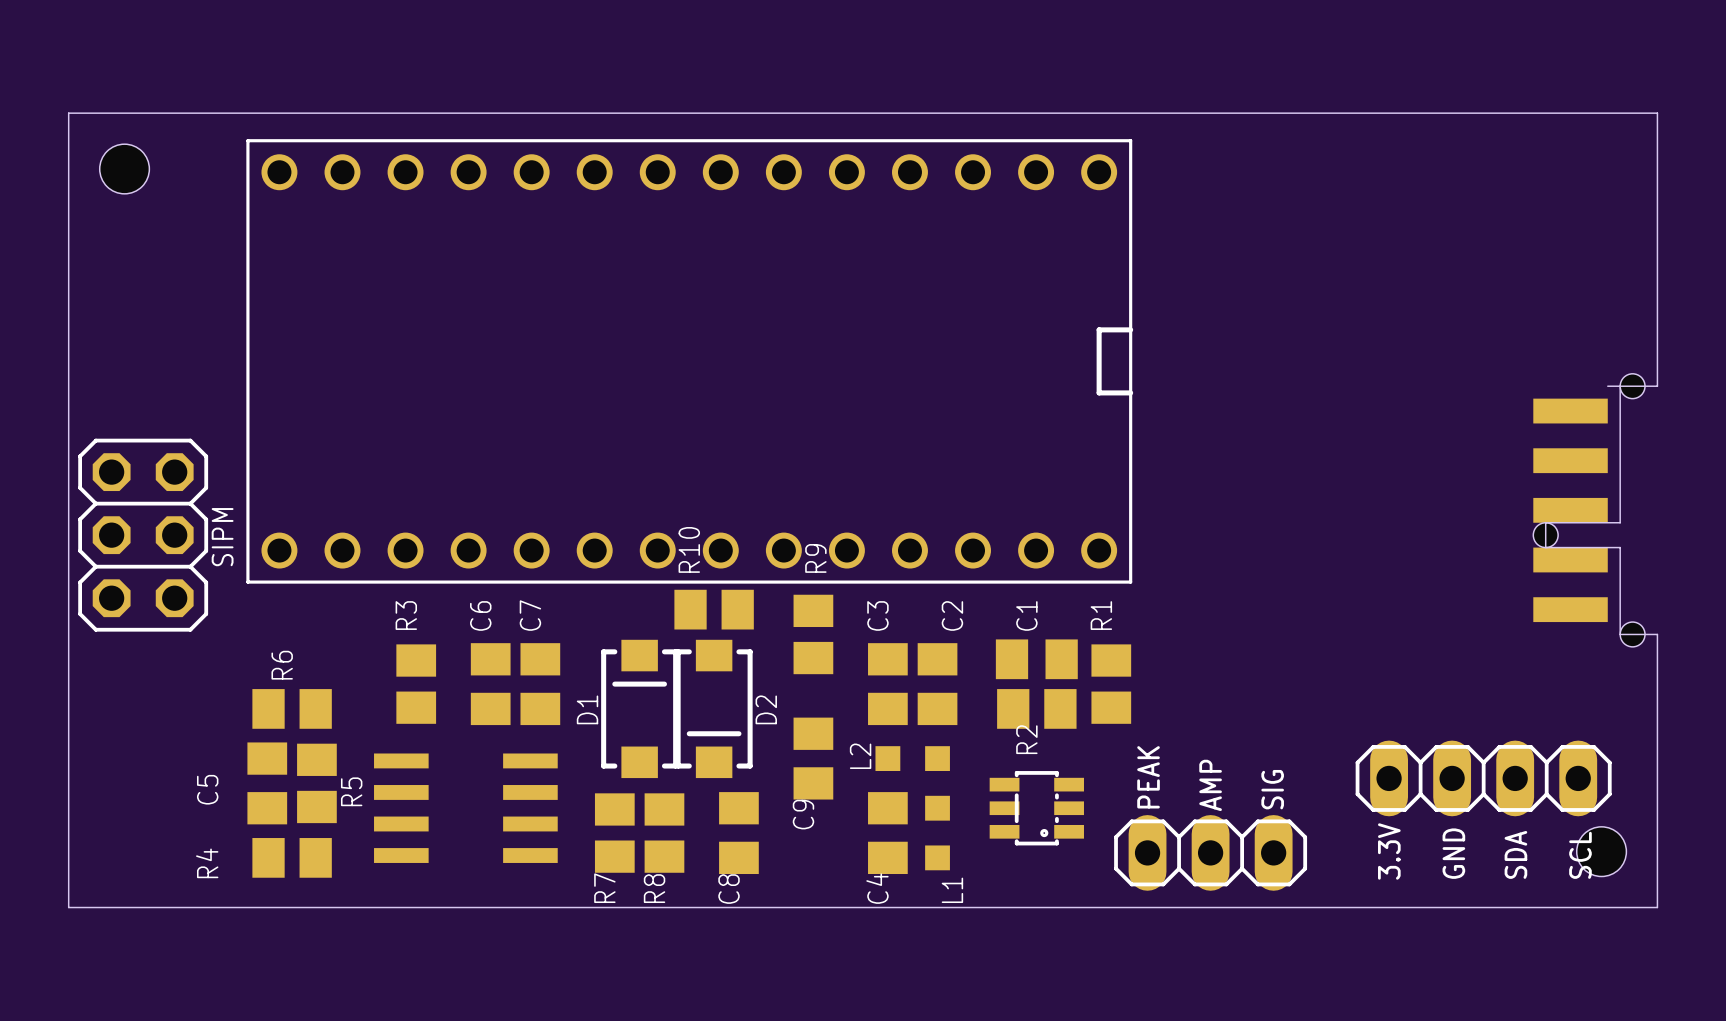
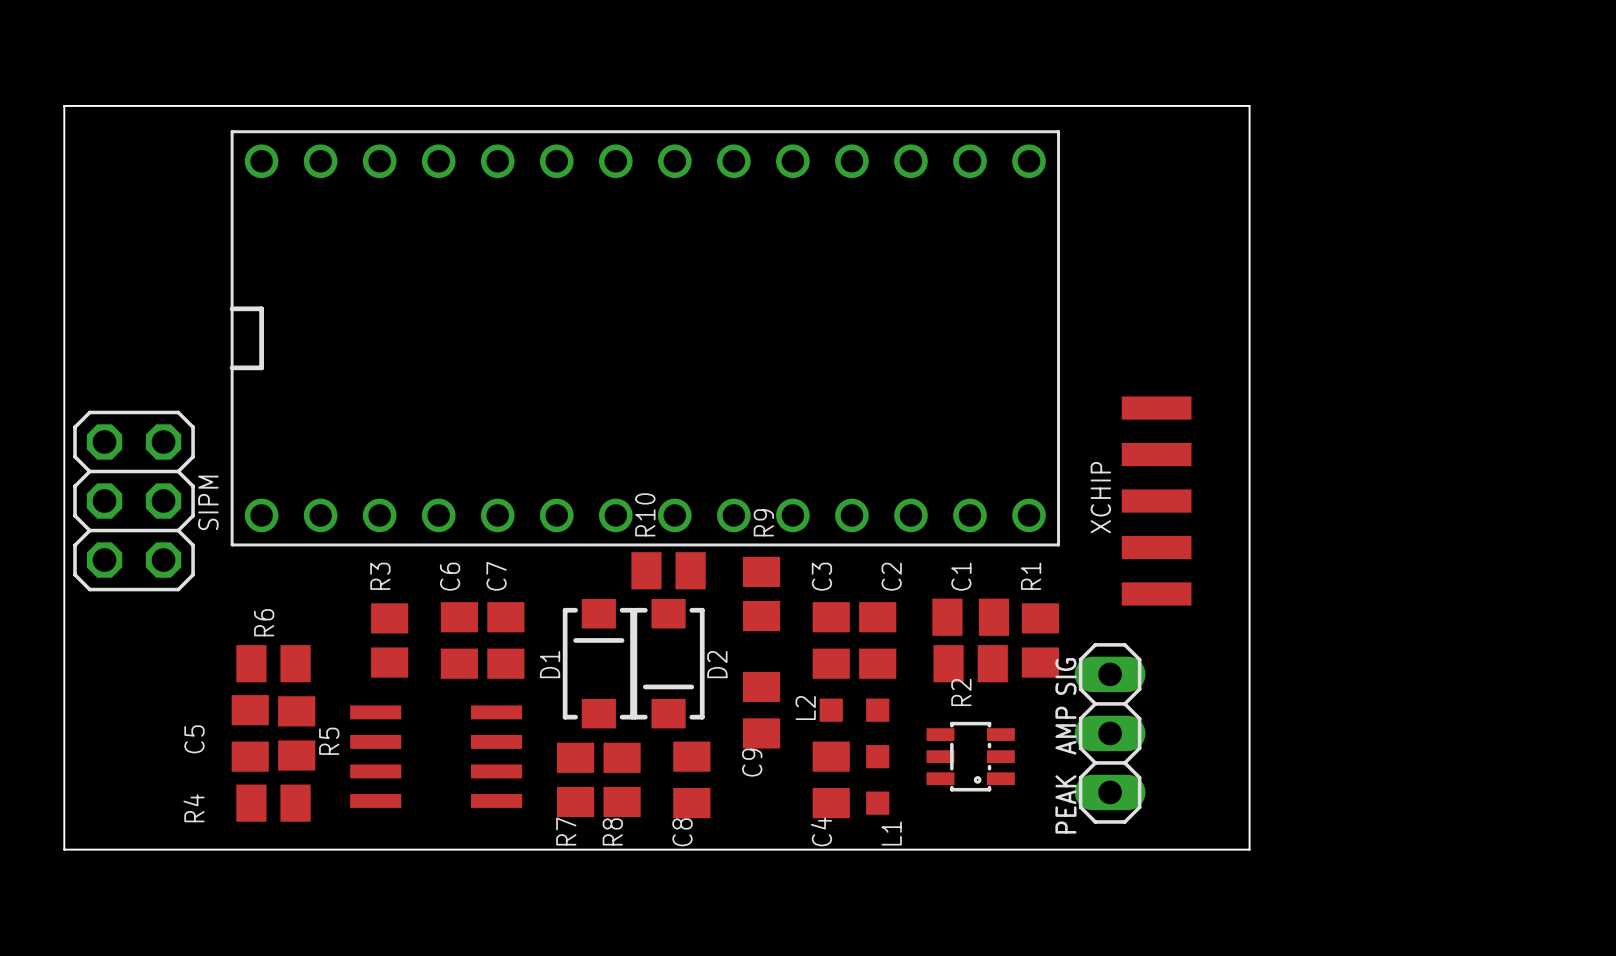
board edge: (1334, 113) (1657, 113) (1657, 386) (1607, 386) -> none
hole: (124, 169) -> none
part rotation: 0° (689, 361) -> 180° (644, 338)
board edge: (1620, 386) (1620, 522) (1545, 522) (1545, 547) (1620, 547) (1620, 634) (1657, 634) (1657, 907) (1334, 907) -> (1249, 105) (1249, 849)
hole: (1632, 386) -> none
part: (1570, 510) -> none
XCHIP: none -> (1156, 501)
hole: (1545, 535) -> none
hole: (1632, 634) -> none
text position: PEAK (1148, 777) -> PEAK (1065, 804)
part: (1483, 778) -> none
text position: AMP (1210, 785) -> AMP (1065, 730)
text position: SIG (1272, 789) -> SIG (1065, 676)
text: 3.3V (1389, 851) -> none
hole: (1601, 851) -> none
part rotation: 0° (1210, 852) -> 90° clockwise (1110, 733)
text: GND (1453, 853) -> none
text: SDA (1515, 854) -> none
text: SCL (1580, 855) -> none

